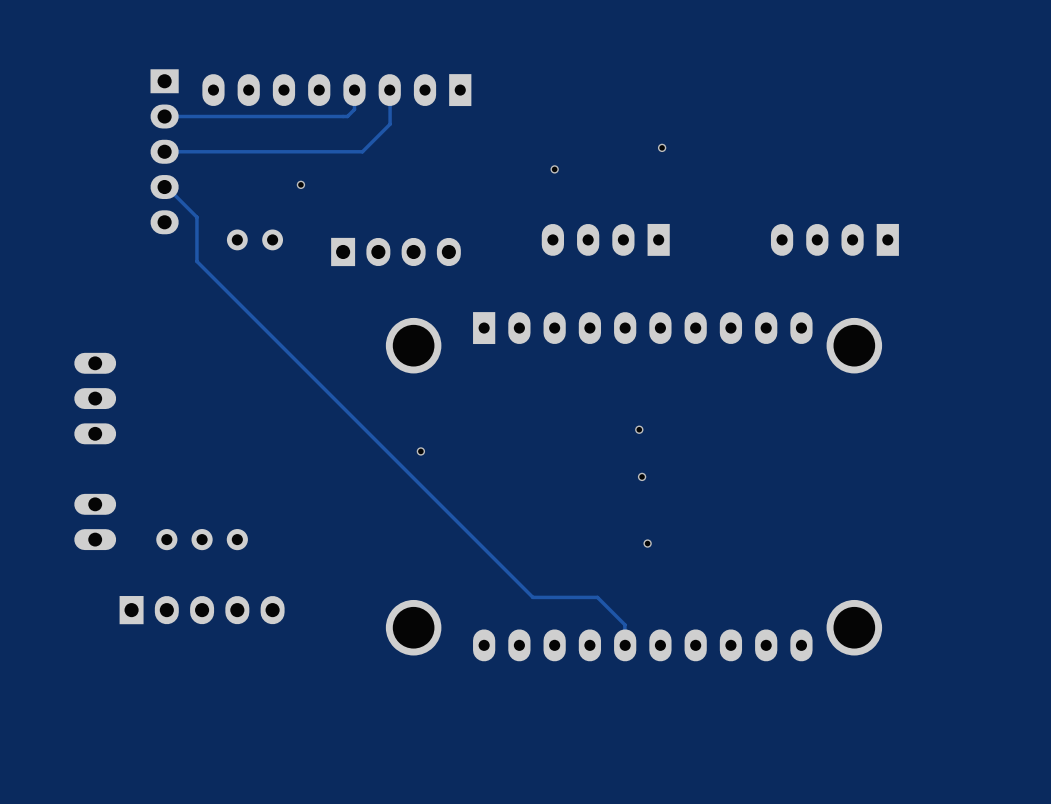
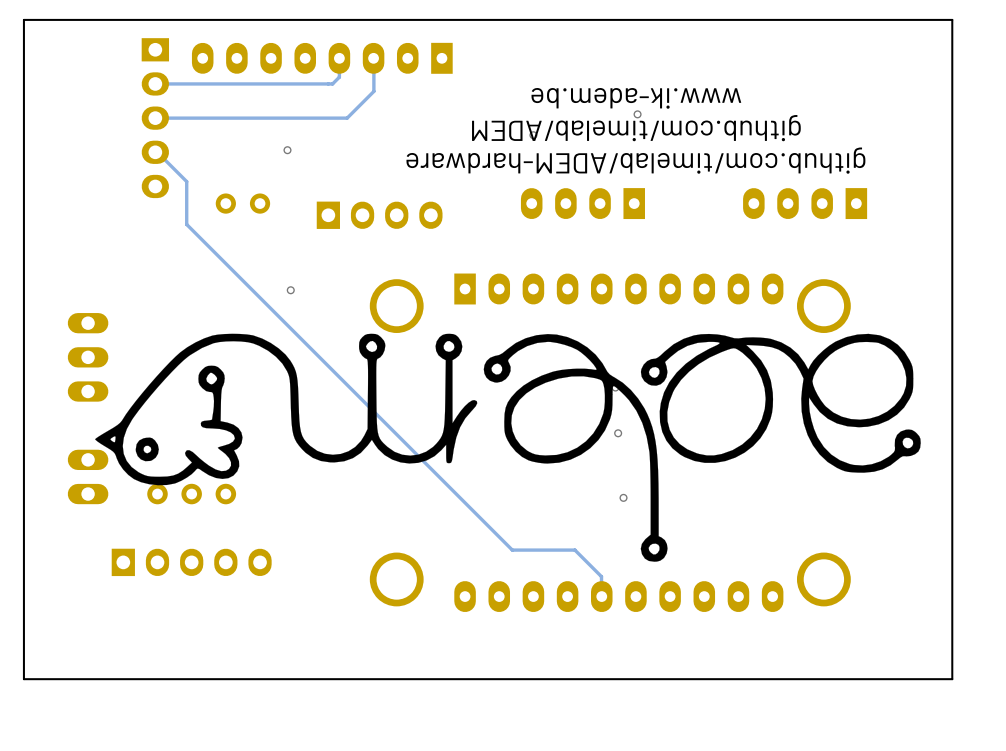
board edge: none -> (952, 19) (952, 679) (23, 679) (23, 19) (952, 19)
text: none -> www.ik-adem.be (636, 98)
text: none -> github.com/timelab/ADEM (636, 128)
text: none -> github.com/timelab/ADEM-hardware (635, 160)
via: none -> (290, 290)
drawing: none -> [95, 333, 921, 562]
via: (420, 451) -> none

